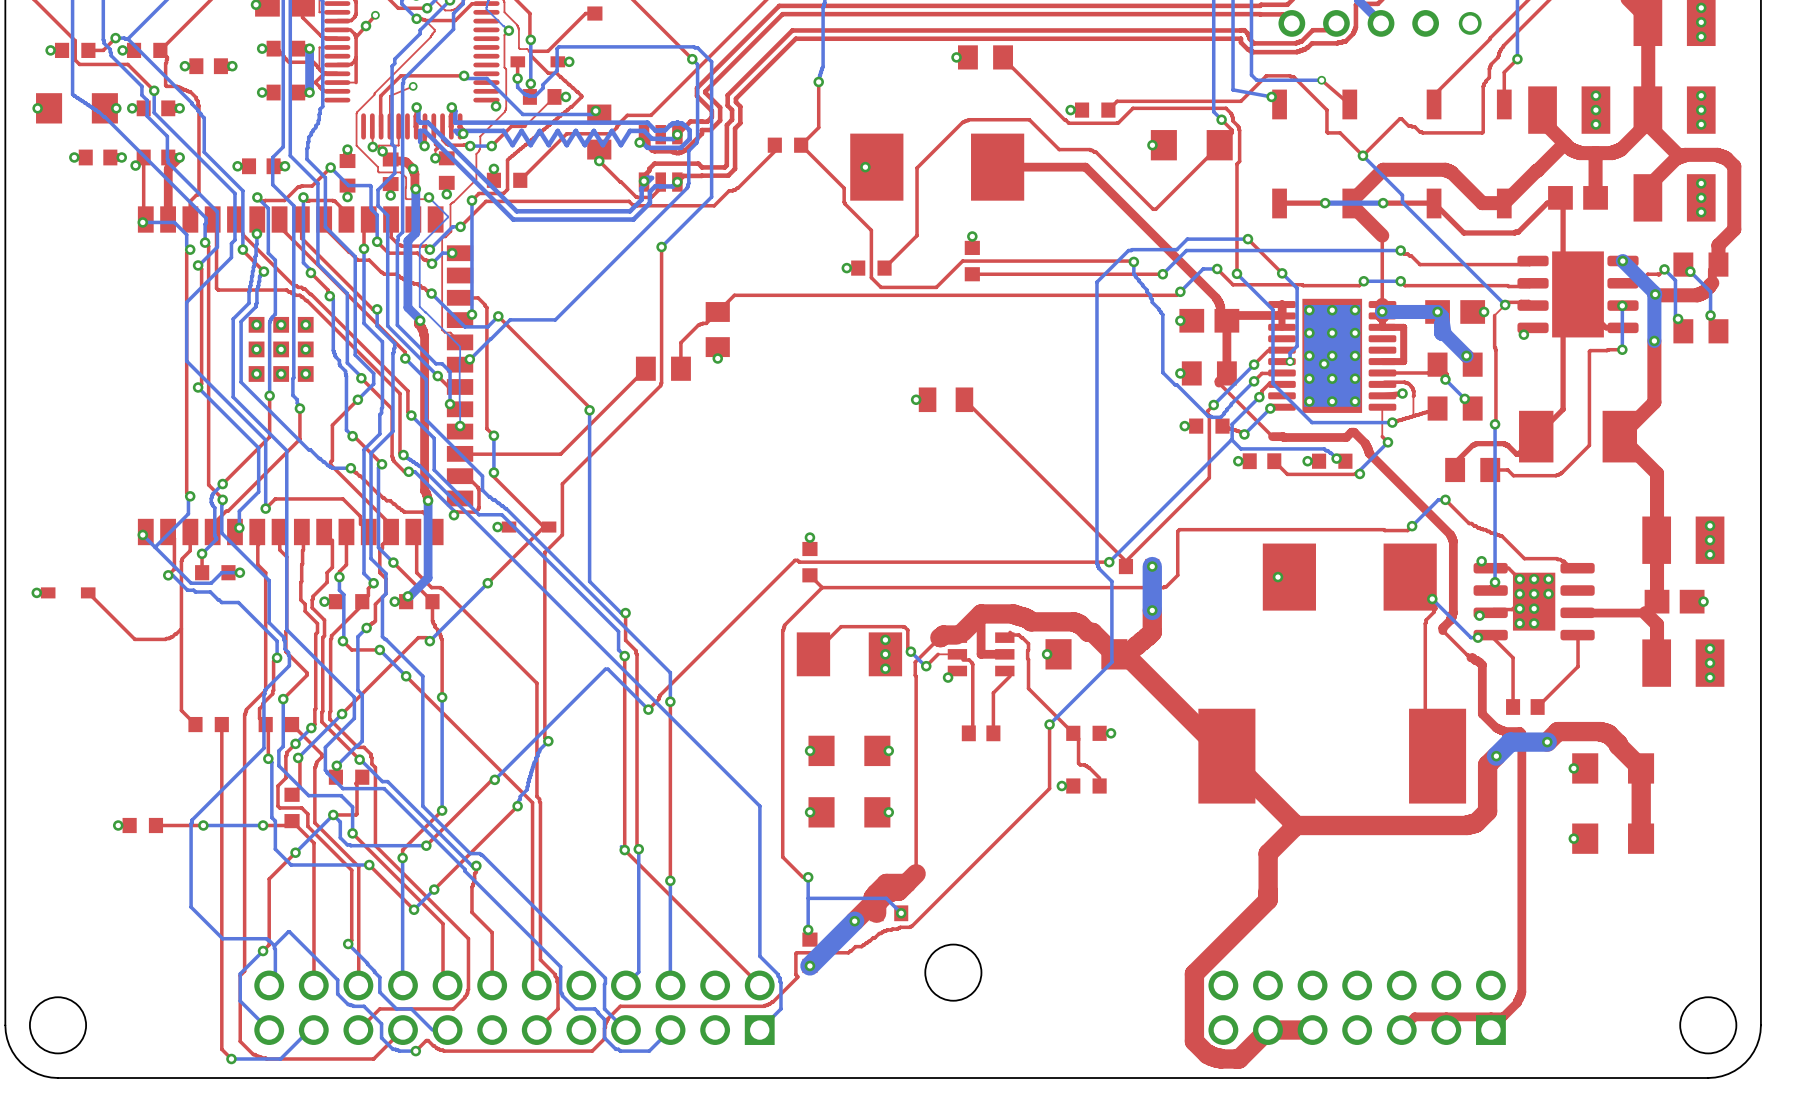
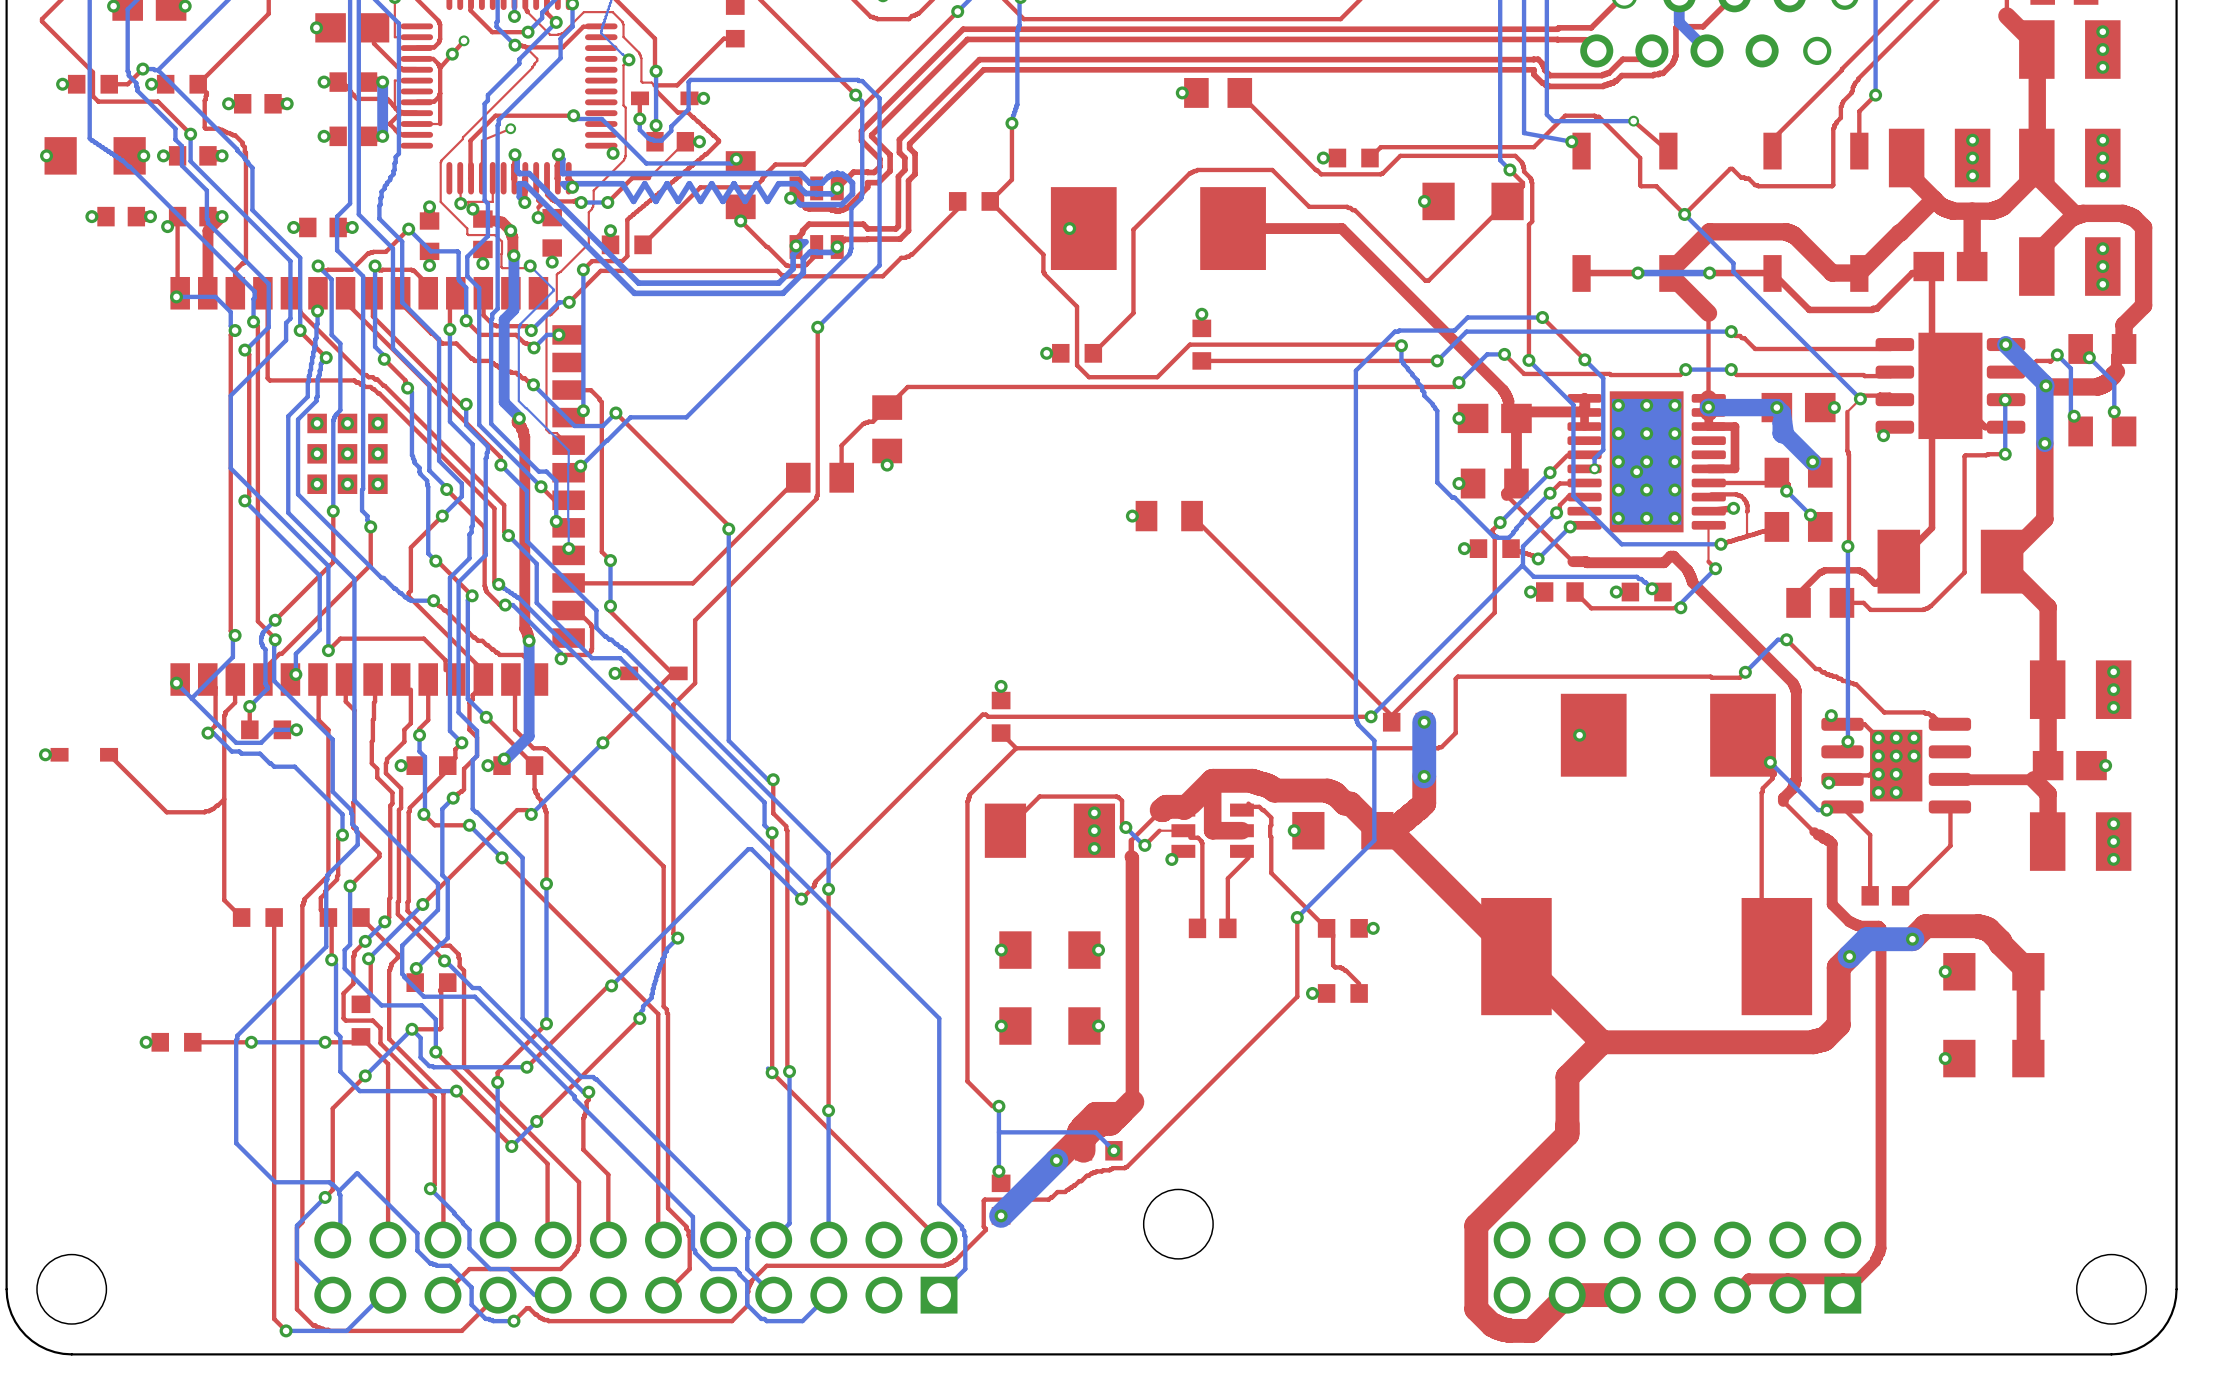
top track width: thin (981, 613) (981, 654) (1004, 654) -> thick (1212, 780) (1212, 830) (1241, 830)
top track width: thin (915, 662) (916, 873) -> thick (1131, 840) (1132, 1101)

